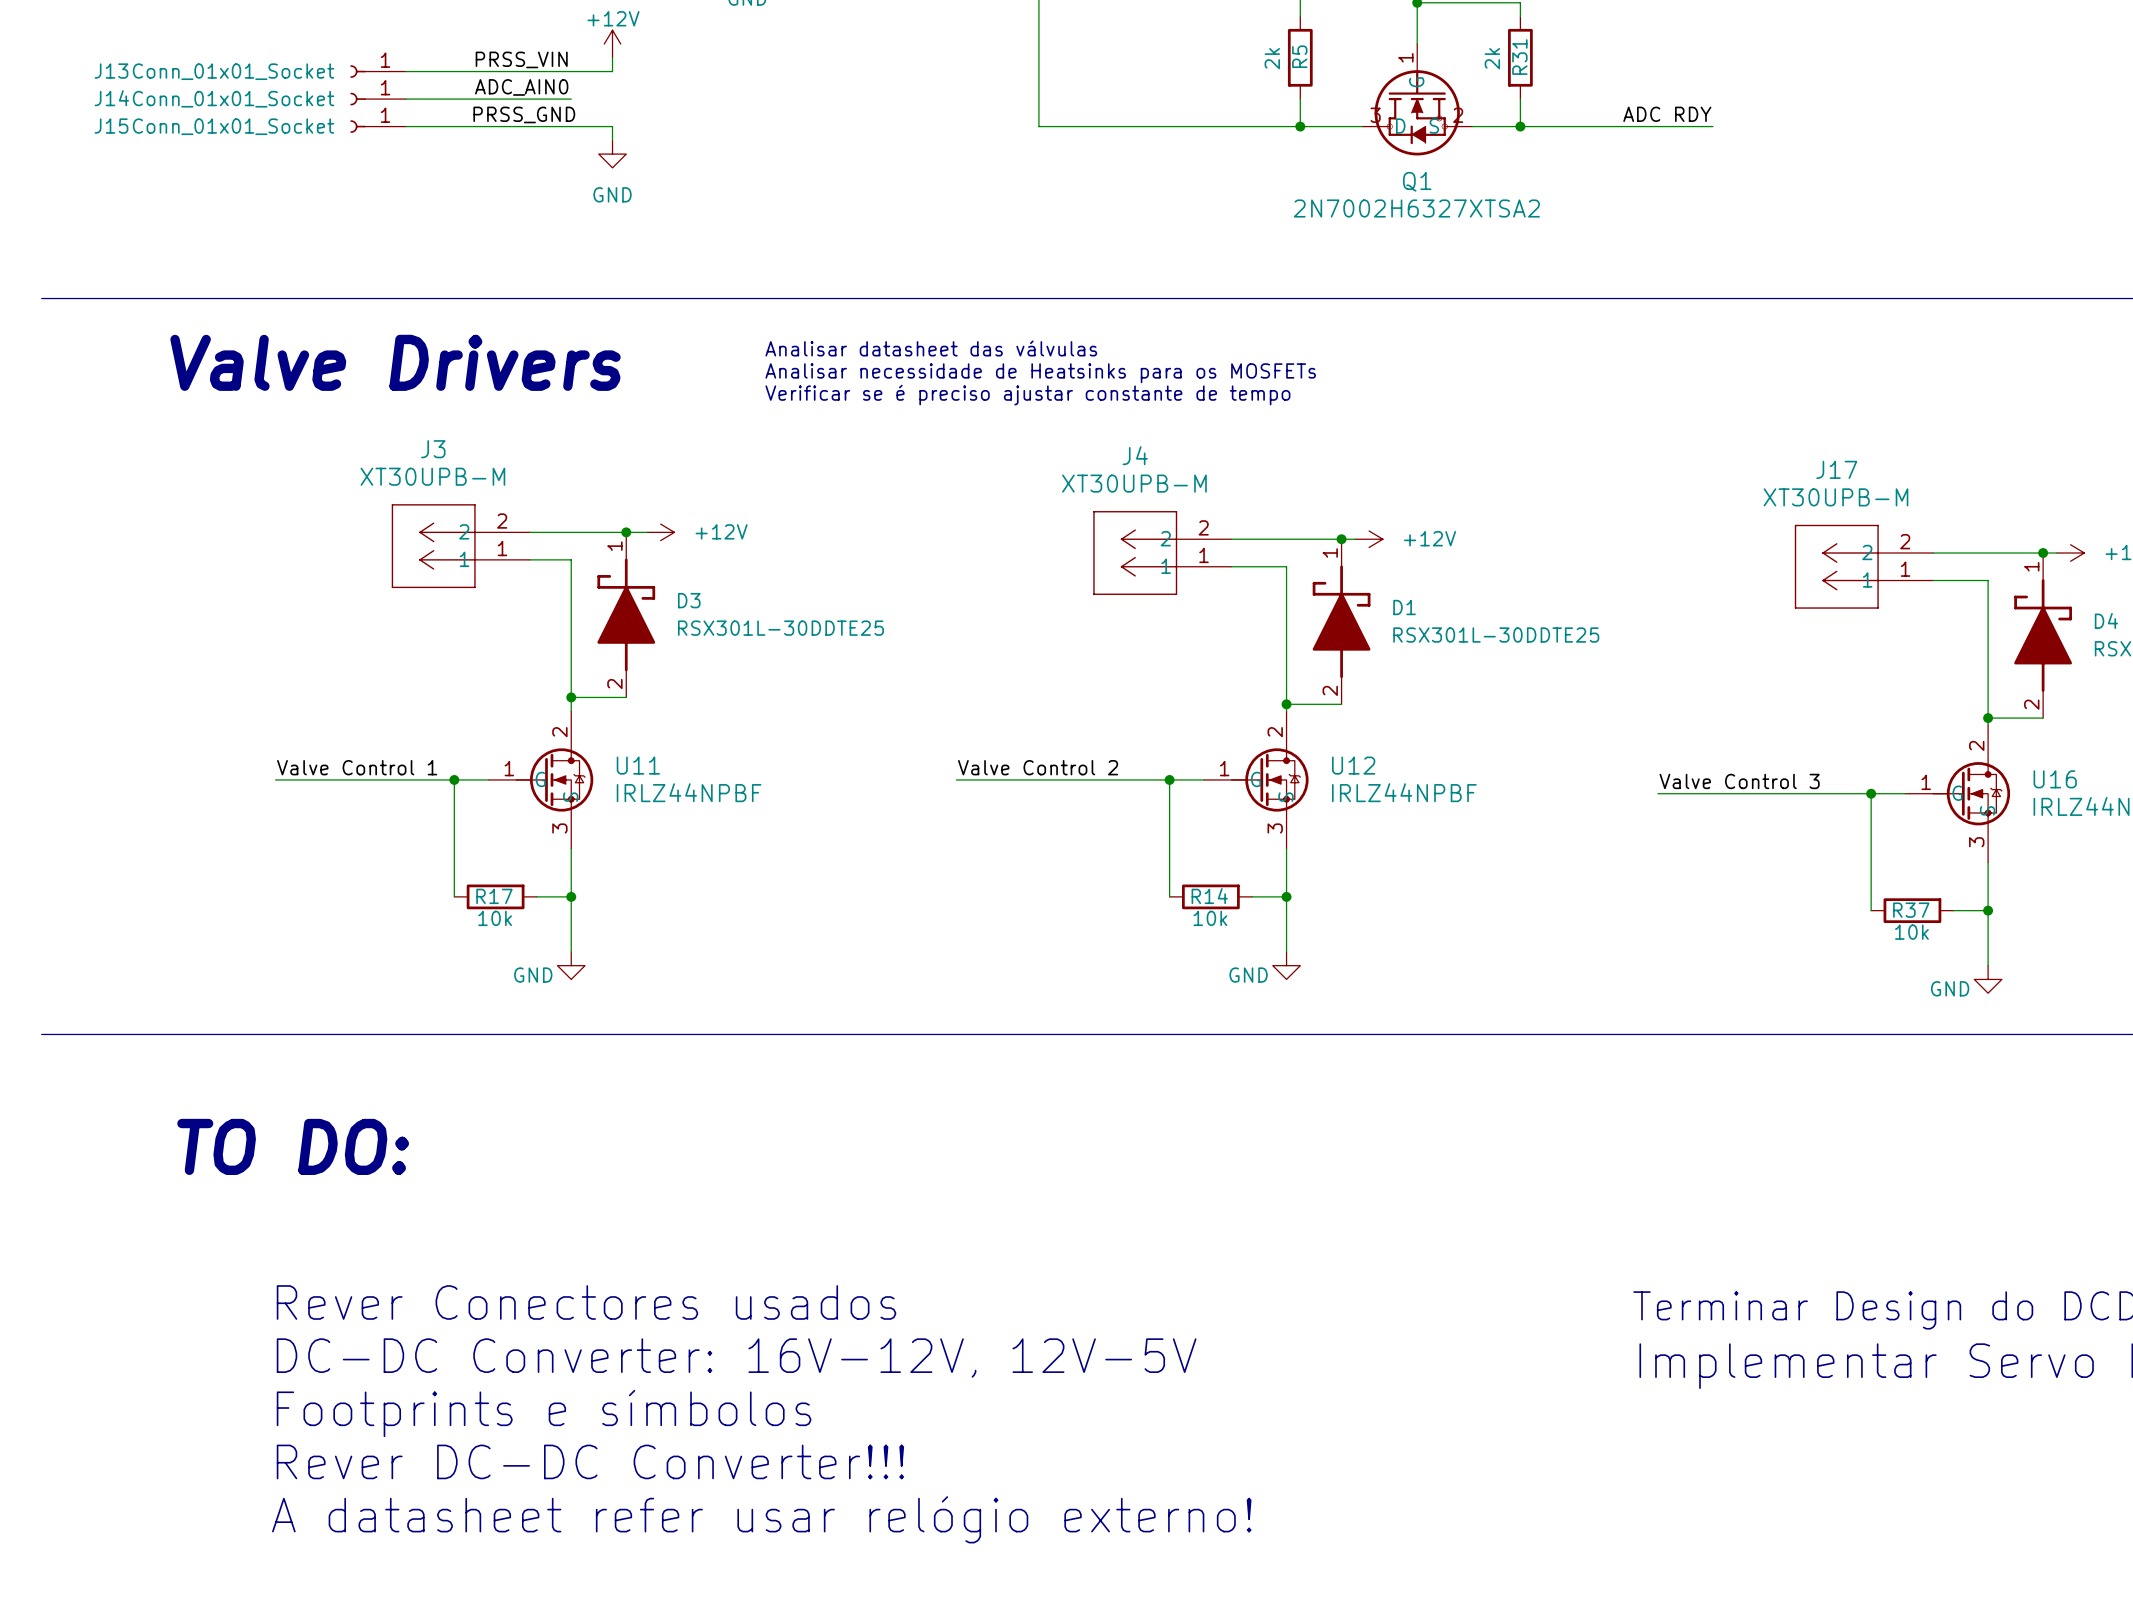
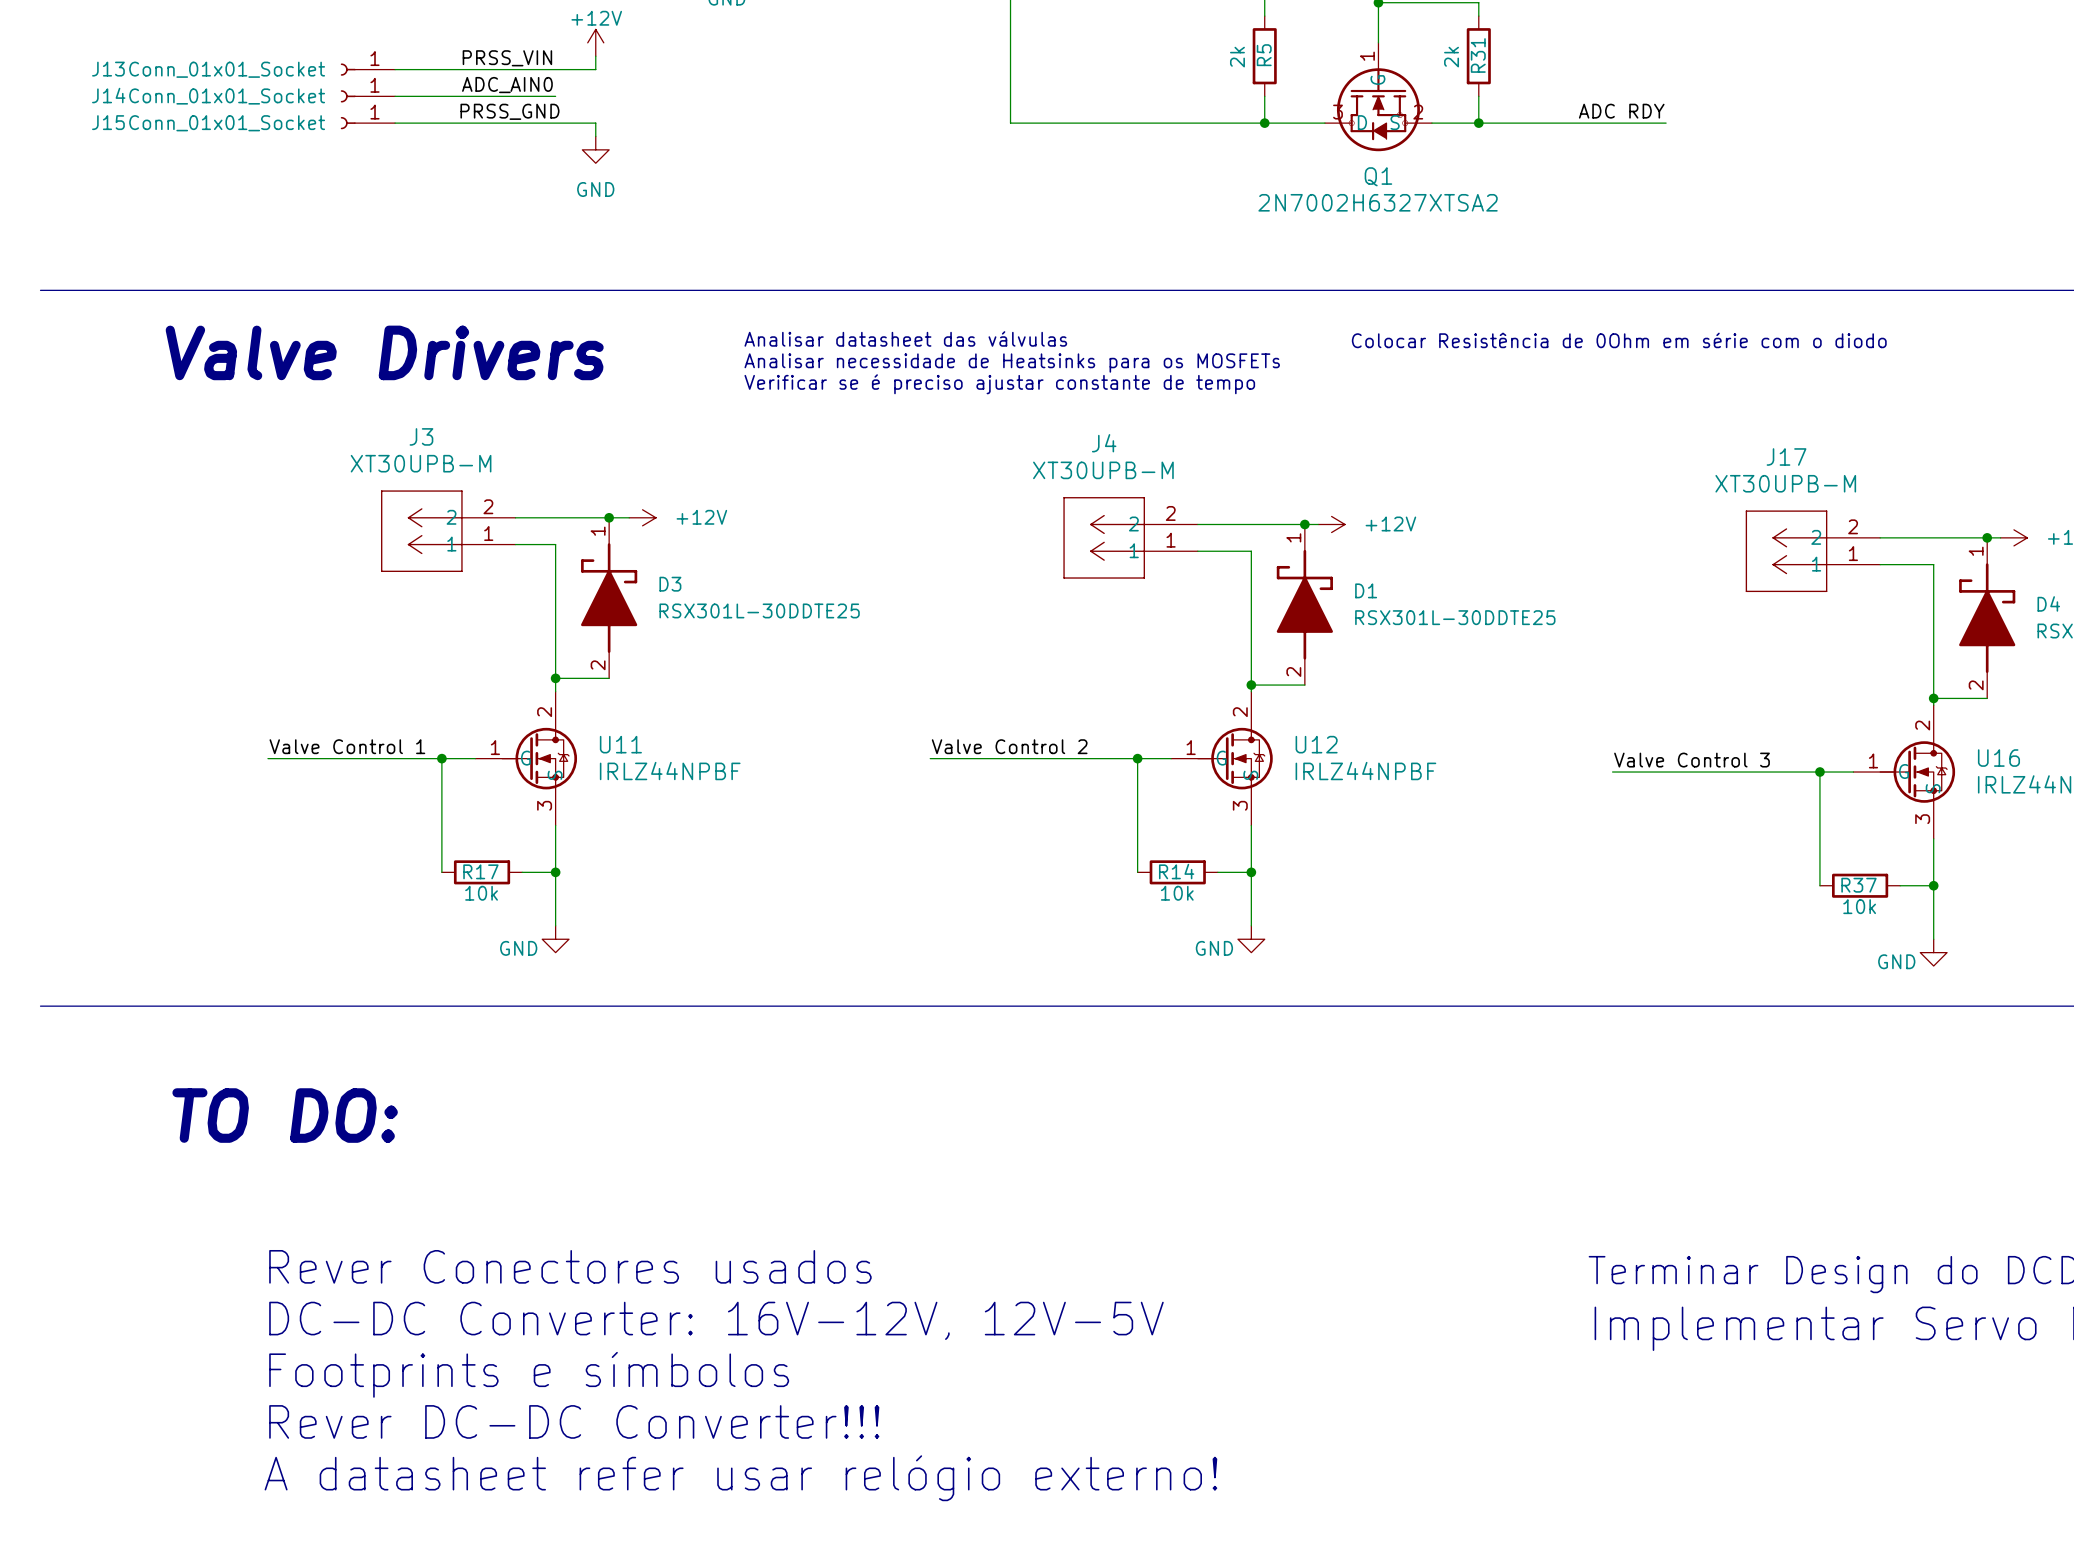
text: none -> Colocar Resistência de 0Ohm em série com o diodo (1619, 340)

